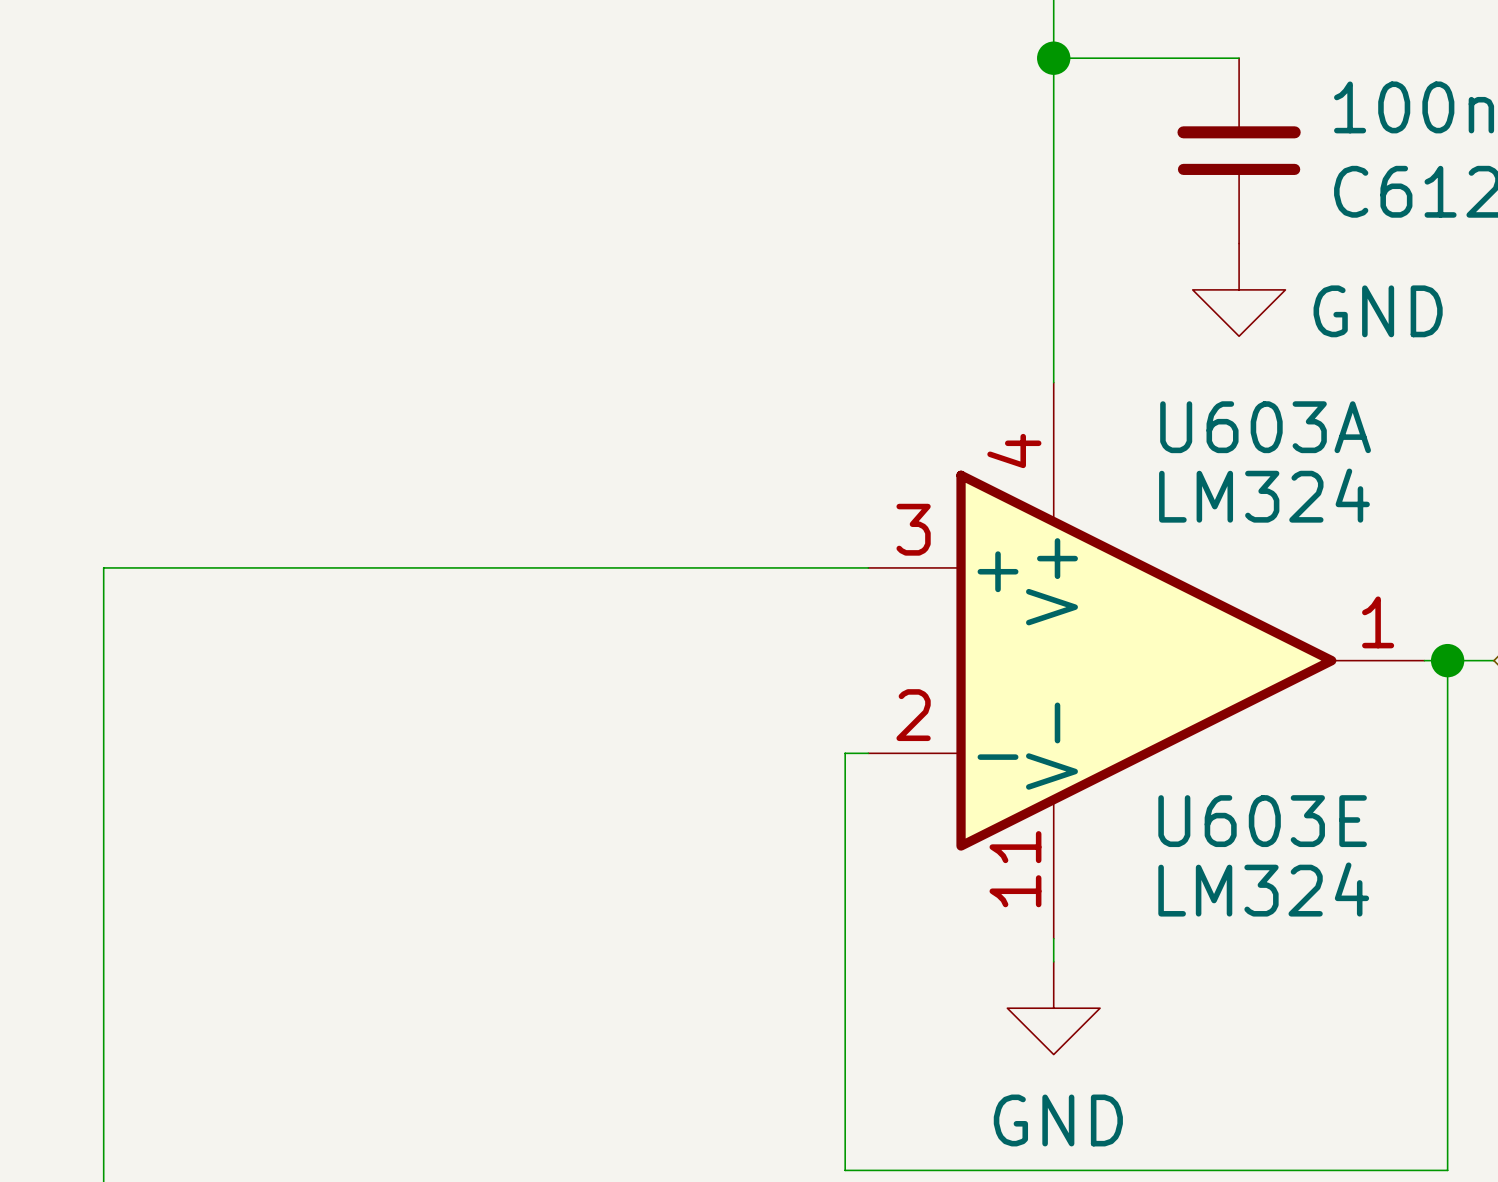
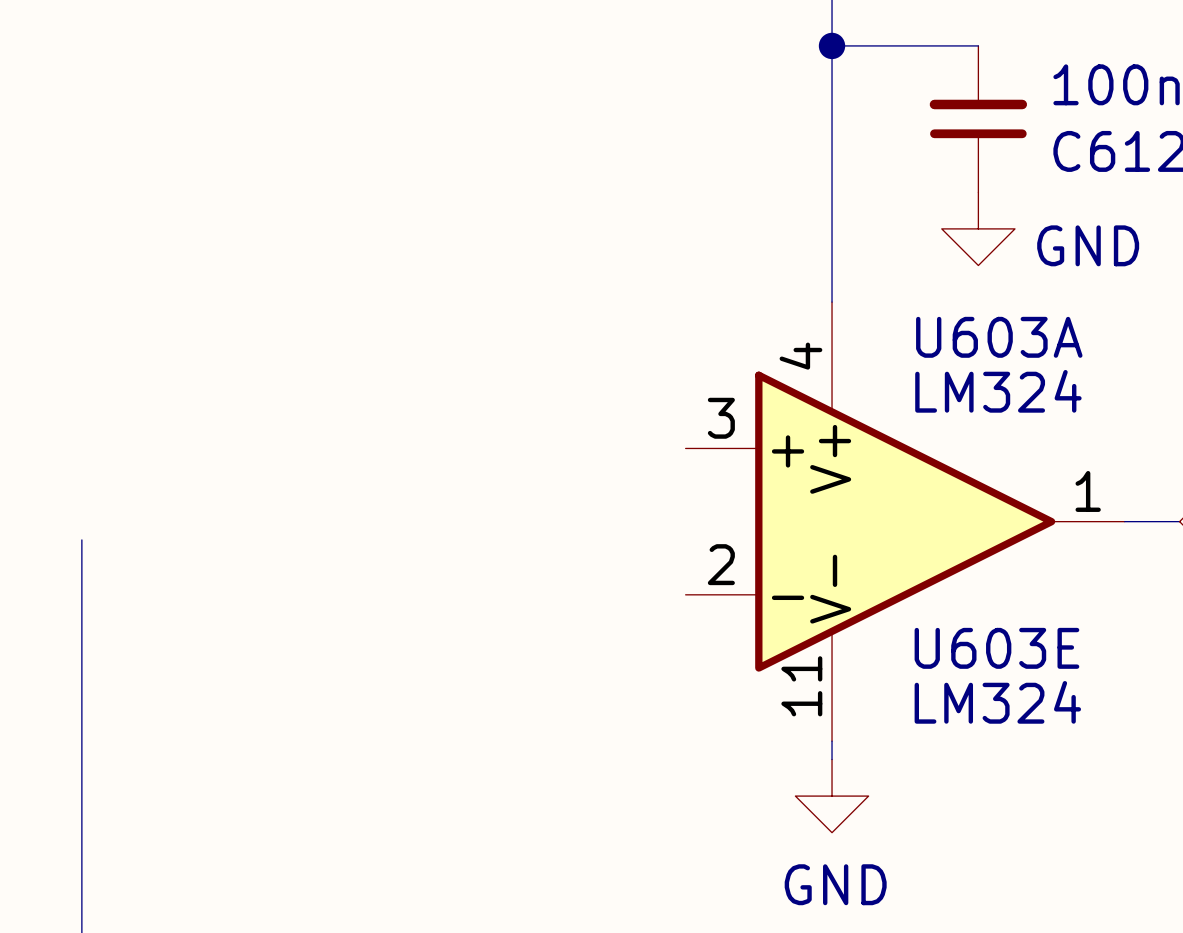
wire: (868, 567) (103, 567) (103, 683) -> none
wire: (1447, 660) (1447, 1170) (845, 1170) (845, 753) (868, 753) -> none
junction: (1447, 660) -> none

